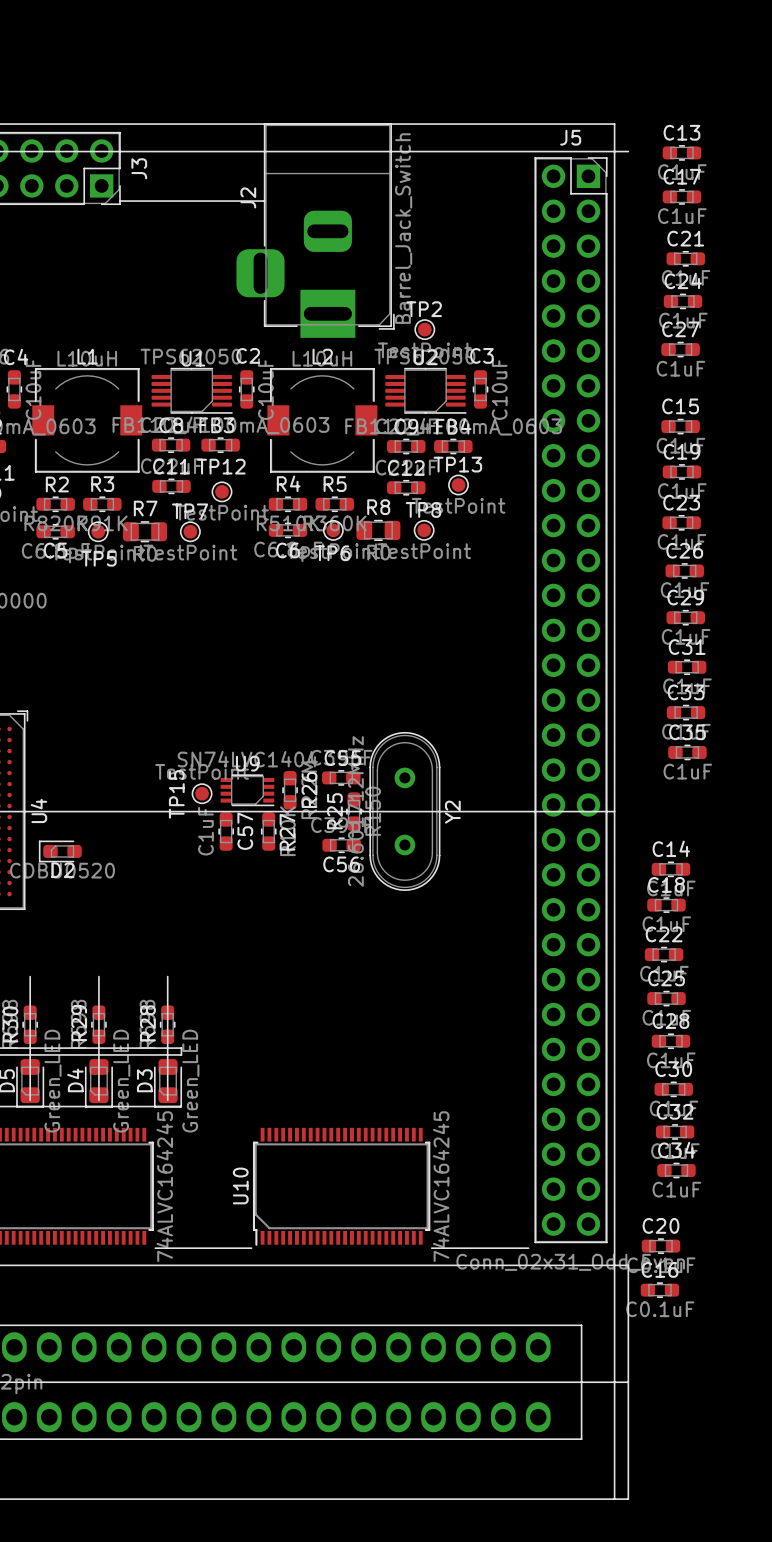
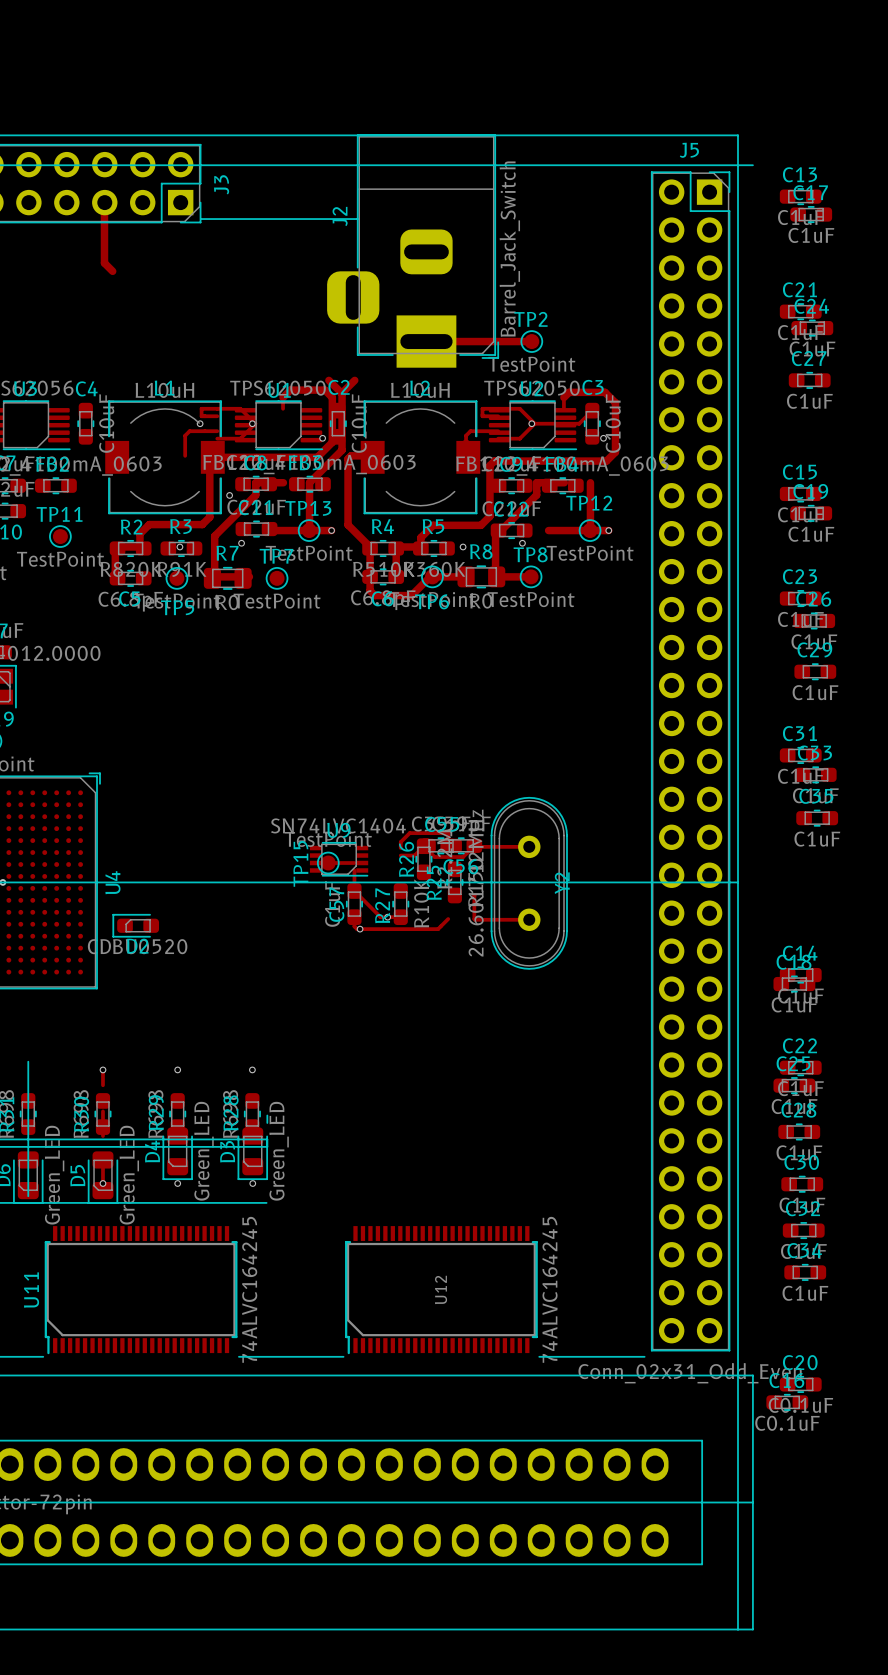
C13 position: (681, 152) -> (800, 196)
track: none -> (104, 209) (104, 263) (112, 271)
C21 position: (685, 258) -> (800, 311)
track: none -> (426, 341) (531, 341)
TP2 position: (424, 329) -> (531, 341)
track: none -> (328, 380) (342, 393)
track: none -> (354, 380) (342, 393) (342, 450) (309, 482) (309, 530)
track: none -> (283, 408) (283, 397) (290, 390) (324, 390) (332, 397) (332, 442) (317, 457)
track: none -> (563, 408) (563, 397) (569, 392) (605, 392) (615, 402) (615, 452) (606, 461) (494, 461) (489, 465) (489, 516) (481, 525) (433, 525) (420, 537) (420, 546) (396, 546) (396, 576)
track: none -> (590, 412) (579, 423) (530, 423)
track: none -> (217, 416) (201, 416) (201, 408) (240, 408) (255, 423) (240, 438) (217, 438)
track: none -> (498, 416) (482, 416) (482, 408) (519, 408) (534, 423) (519, 438) (498, 438)
via: none -> (200, 423)
via: none -> (252, 423)
via: none -> (531, 423)
track: none -> (217, 431) (189, 431) (185, 435) (185, 455)
track: none -> (498, 431) (470, 431) (466, 435) (466, 455) (466, 443)
via: none -> (322, 438)
via: none -> (603, 438)
track: none -> (370, 455) (351, 455) (348, 458) (348, 524) (370, 546)
track: none -> (317, 457) (219, 457) (209, 467) (209, 517) (202, 524) (149, 524) (139, 533) (139, 546) (115, 546) (115, 576)
C15 position: (680, 426) -> (800, 493)
track: none -> (283, 482) (255, 482) (255, 495) (214, 536) (214, 576) (249, 576)
track: none -> (564, 482) (536, 482) (536, 495) (495, 536) (495, 576) (530, 576)
track: none -> (590, 482) (590, 530)
via: none -> (229, 495)
TP13 position: (458, 485) -> (309, 530)
track: none -> (267, 530) (331, 530)
via: none -> (331, 530)
track: none -> (548, 530) (608, 530)
via: none -> (608, 530)
TP12 position: (222, 491) -> (590, 530)
via: none -> (241, 543)
via: none -> (522, 543)
via: none -> (179, 546)
track: none -> (370, 546) (370, 590) (374, 595) (411, 595) (430, 576) (464, 576)
via: none -> (463, 546)
C23 position: (681, 522) -> (800, 598)
C31 position: (687, 667) -> (800, 755)
track: none -> (448, 845) (448, 833) (409, 833) (400, 842) (400, 848)
track: none -> (529, 846) (474, 845) (463, 857) (434, 857) (423, 846) (414, 855) (400, 855)
R26 position: (290, 790) -> (423, 859)
TP15 position: (202, 793) -> (328, 863)
track: none -> (328, 863) (354, 863)
track: none -> (354, 870) (354, 891) (380, 917) (400, 917)
Y2 position: (404, 811) -> (529, 883)
track: none -> (474, 895) (475, 919) (529, 919)
C57 position: (226, 831) -> (354, 904)
R27 position: (268, 831) -> (400, 904)
track: none -> (354, 917) (354, 926) (357, 929) (438, 929) (448, 919)
via: none -> (387, 917)
C56 position: (341, 845) -> (461, 845)
via: none -> (360, 929)
C14 position: (670, 869) -> (800, 975)
C22 position: (664, 954) -> (800, 1067)
line: (30, 976) (30, 1100) -> none
line: (98, 976) (98, 1100) -> none
line: (167, 976) (167, 1100) -> none
track: none -> (102, 1069) (102, 1085)
via: none -> (102, 1069)
via: none -> (177, 1069)
via: none -> (252, 1069)
track: none -> (102, 1111) (102, 1136)
line: none -> (267, 1115) (267, 1122)
track: none -> (102, 1166) (102, 1183)
D4 position: (98, 1083) -> (177, 1153)
D3 position: (168, 1083) -> (252, 1153)
via: none -> (102, 1183)
via: none -> (177, 1183)
via: none -> (252, 1183)
U10 name: U10 (240, 1185) -> U12 (441, 1289)
C20 position: (661, 1246) -> (800, 1384)

